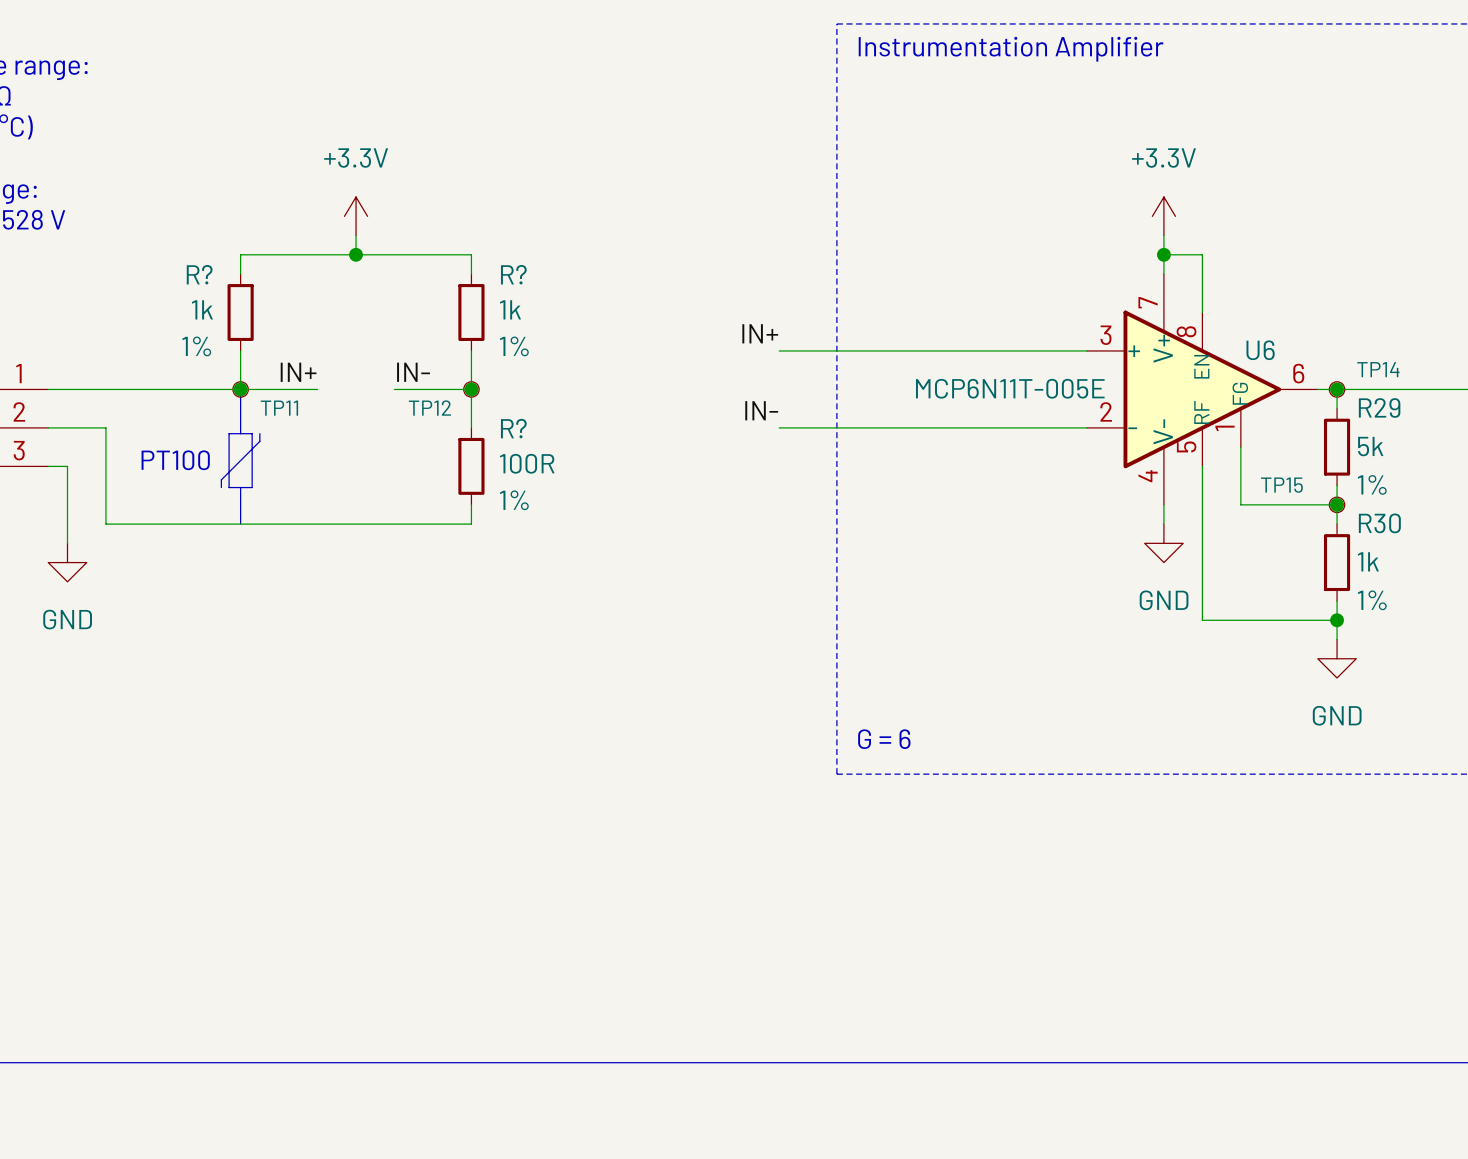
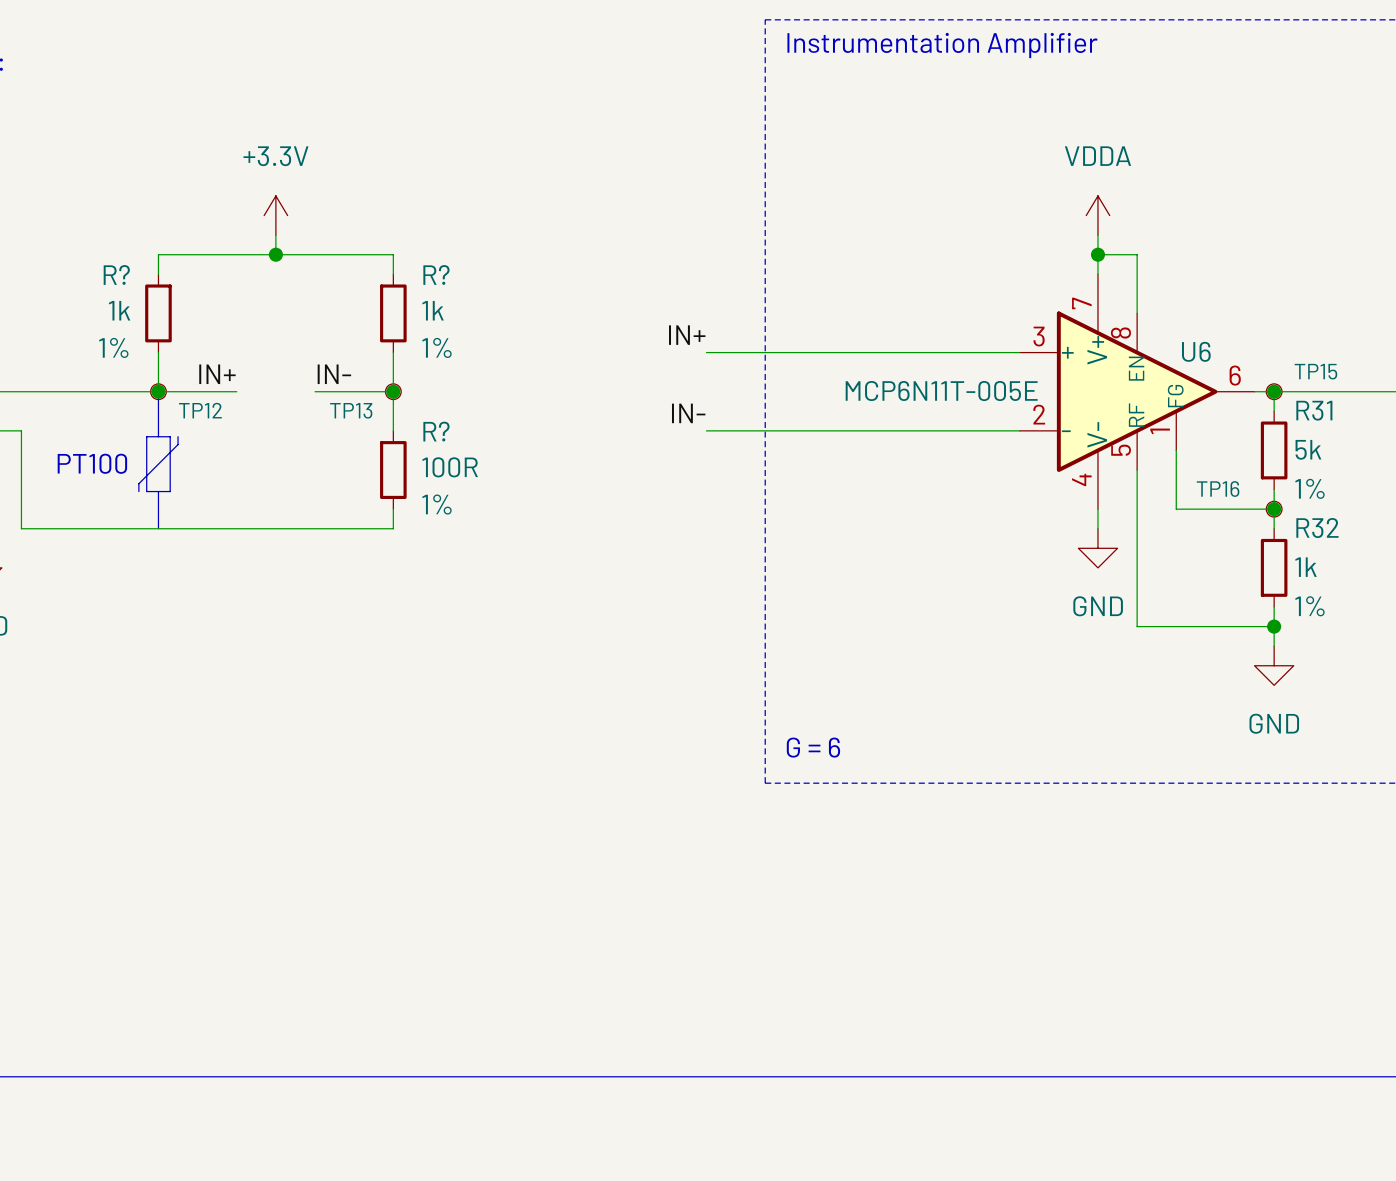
power symbol: +3.3V (1163, 216) -> VDDA (1097, 215)
TP14 name: TP14 (1378, 369) -> TP15 (1315, 371)
R29 name: R29 (1379, 407) -> R31 (1314, 410)
TP11 name: TP11 (279, 408) -> TP12 (200, 410)
TP12 name: TP12 (429, 408) -> TP13 (351, 410)
TP15 name: TP15 (1281, 485) -> TP16 (1218, 489)
R30 name: R30 (1379, 523) -> R32 (1317, 528)

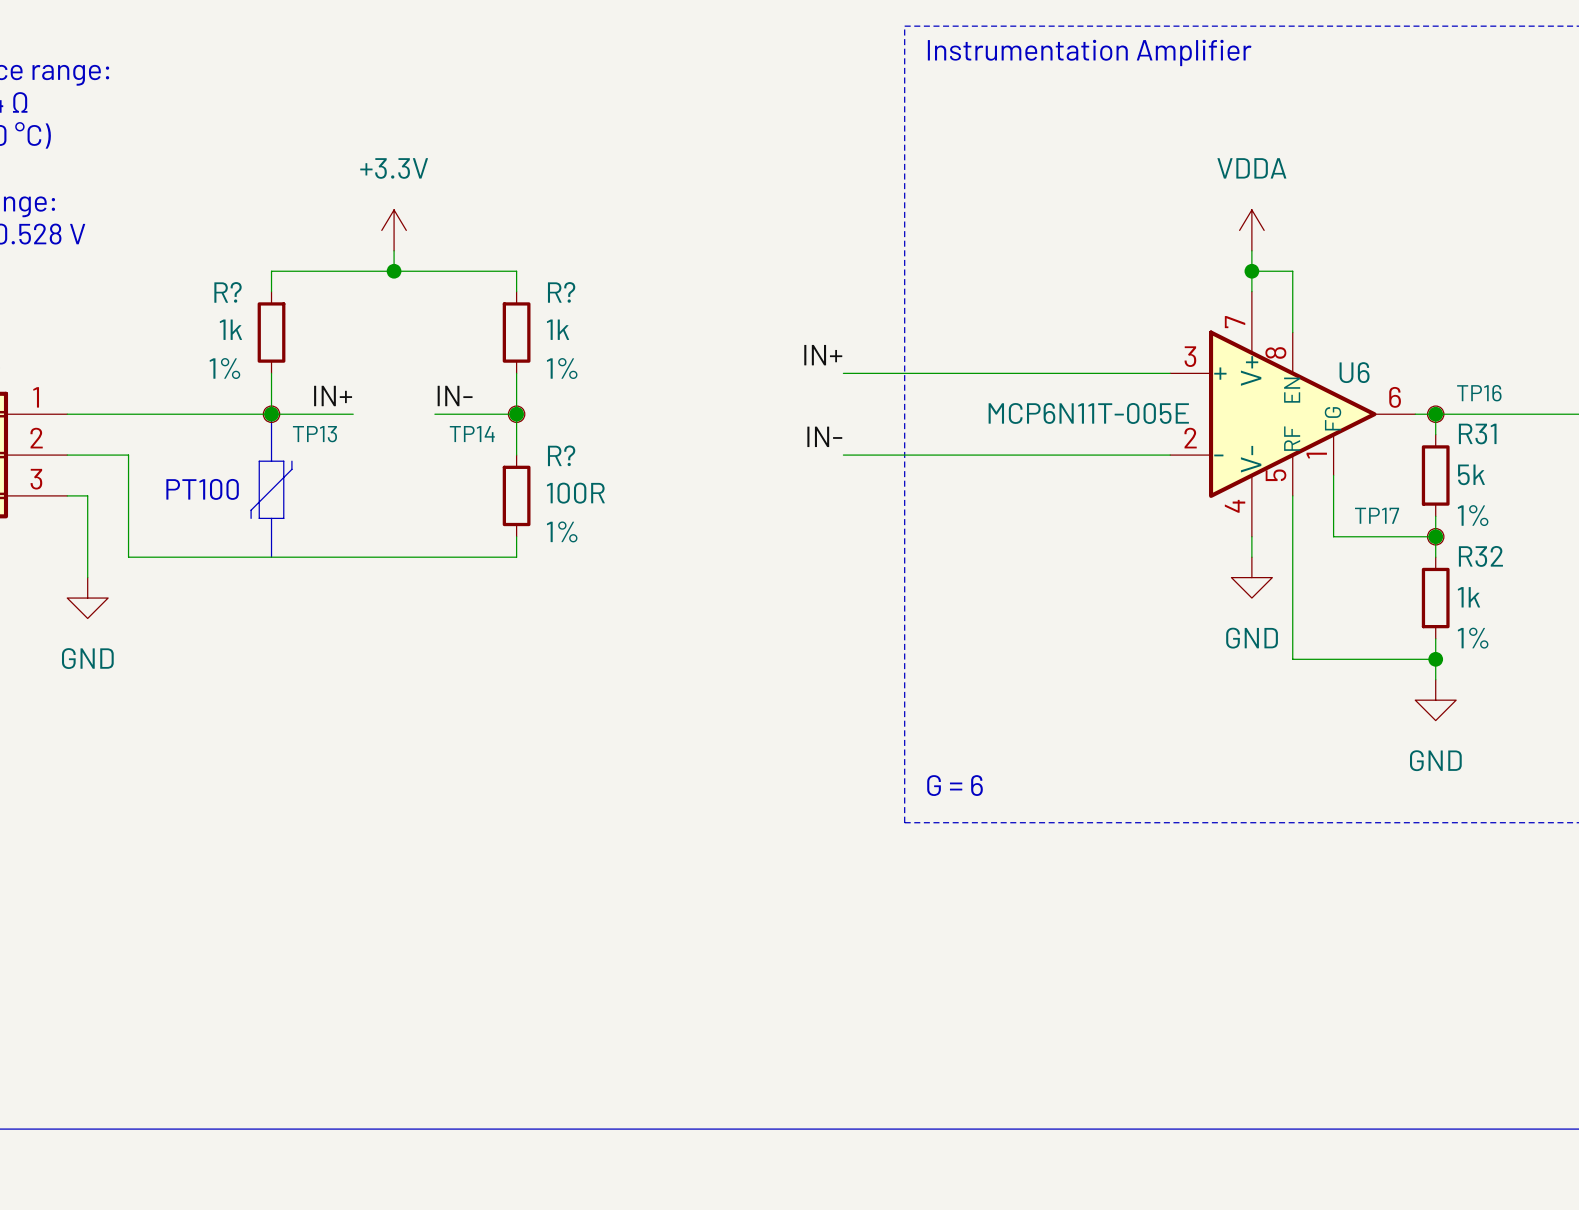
TP15 name: TP15 (1315, 371) -> TP16 (1479, 393)
TP12 name: TP12 (200, 410) -> TP13 (314, 434)
TP13 name: TP13 (351, 410) -> TP14 (472, 434)
TP16 name: TP16 (1218, 489) -> TP17 (1377, 515)

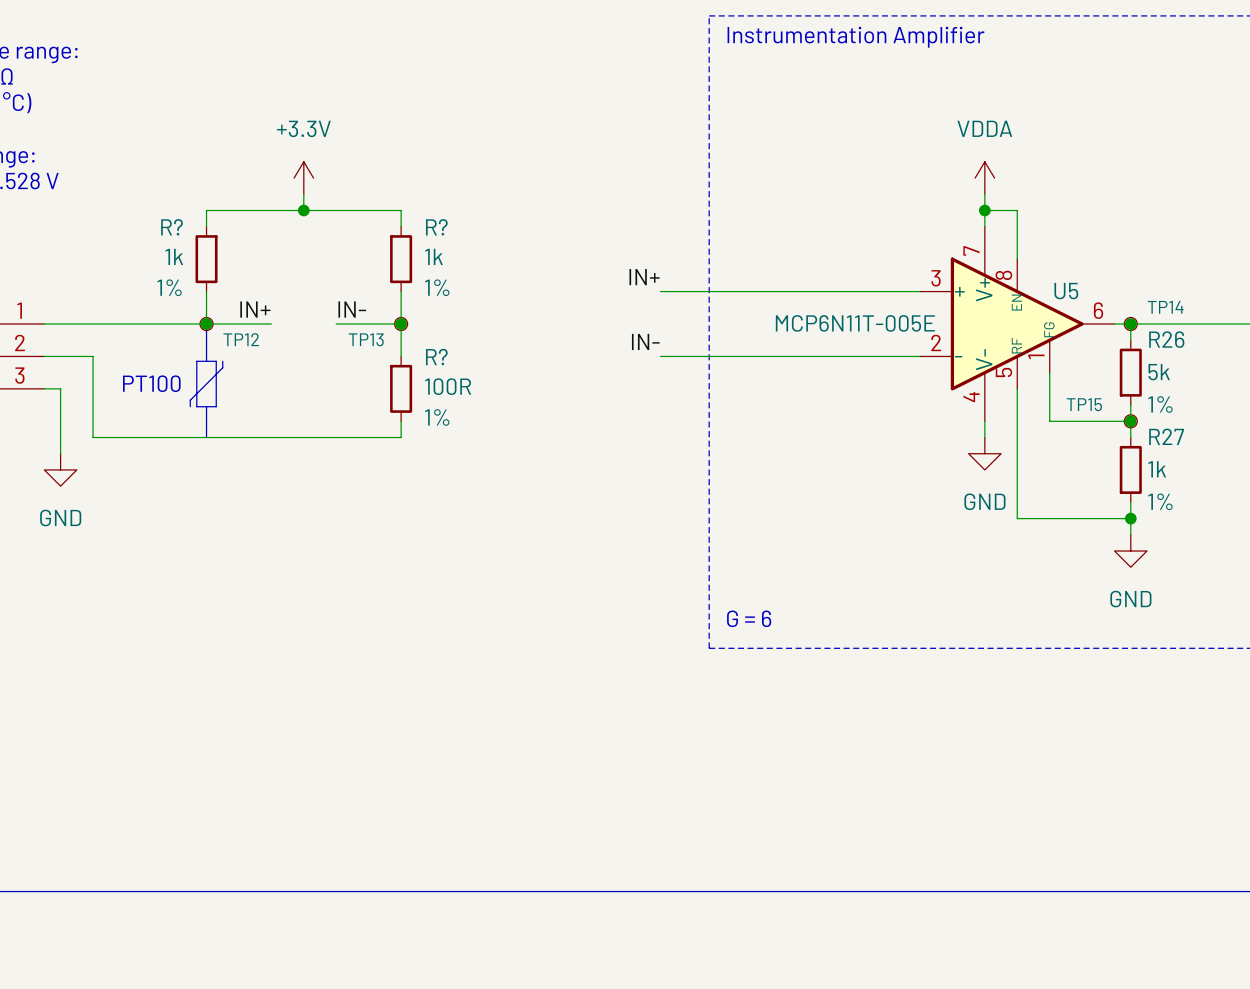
U6 symbol: [1170, 291, 1416, 537] -> [919, 226, 1115, 422]
U6 name: U6 (1354, 372) -> U5 (1066, 291)
TP16 name: TP16 (1479, 393) -> TP14 (1165, 307)
TP13 name: TP13 (314, 434) -> TP12 (241, 339)
TP14 name: TP14 (472, 434) -> TP13 (366, 339)
R31 name: R31 (1477, 434) -> R26 (1166, 339)
TP17 name: TP17 (1377, 515) -> TP15 (1084, 404)
R32 name: R32 (1480, 556) -> R27 (1166, 436)

